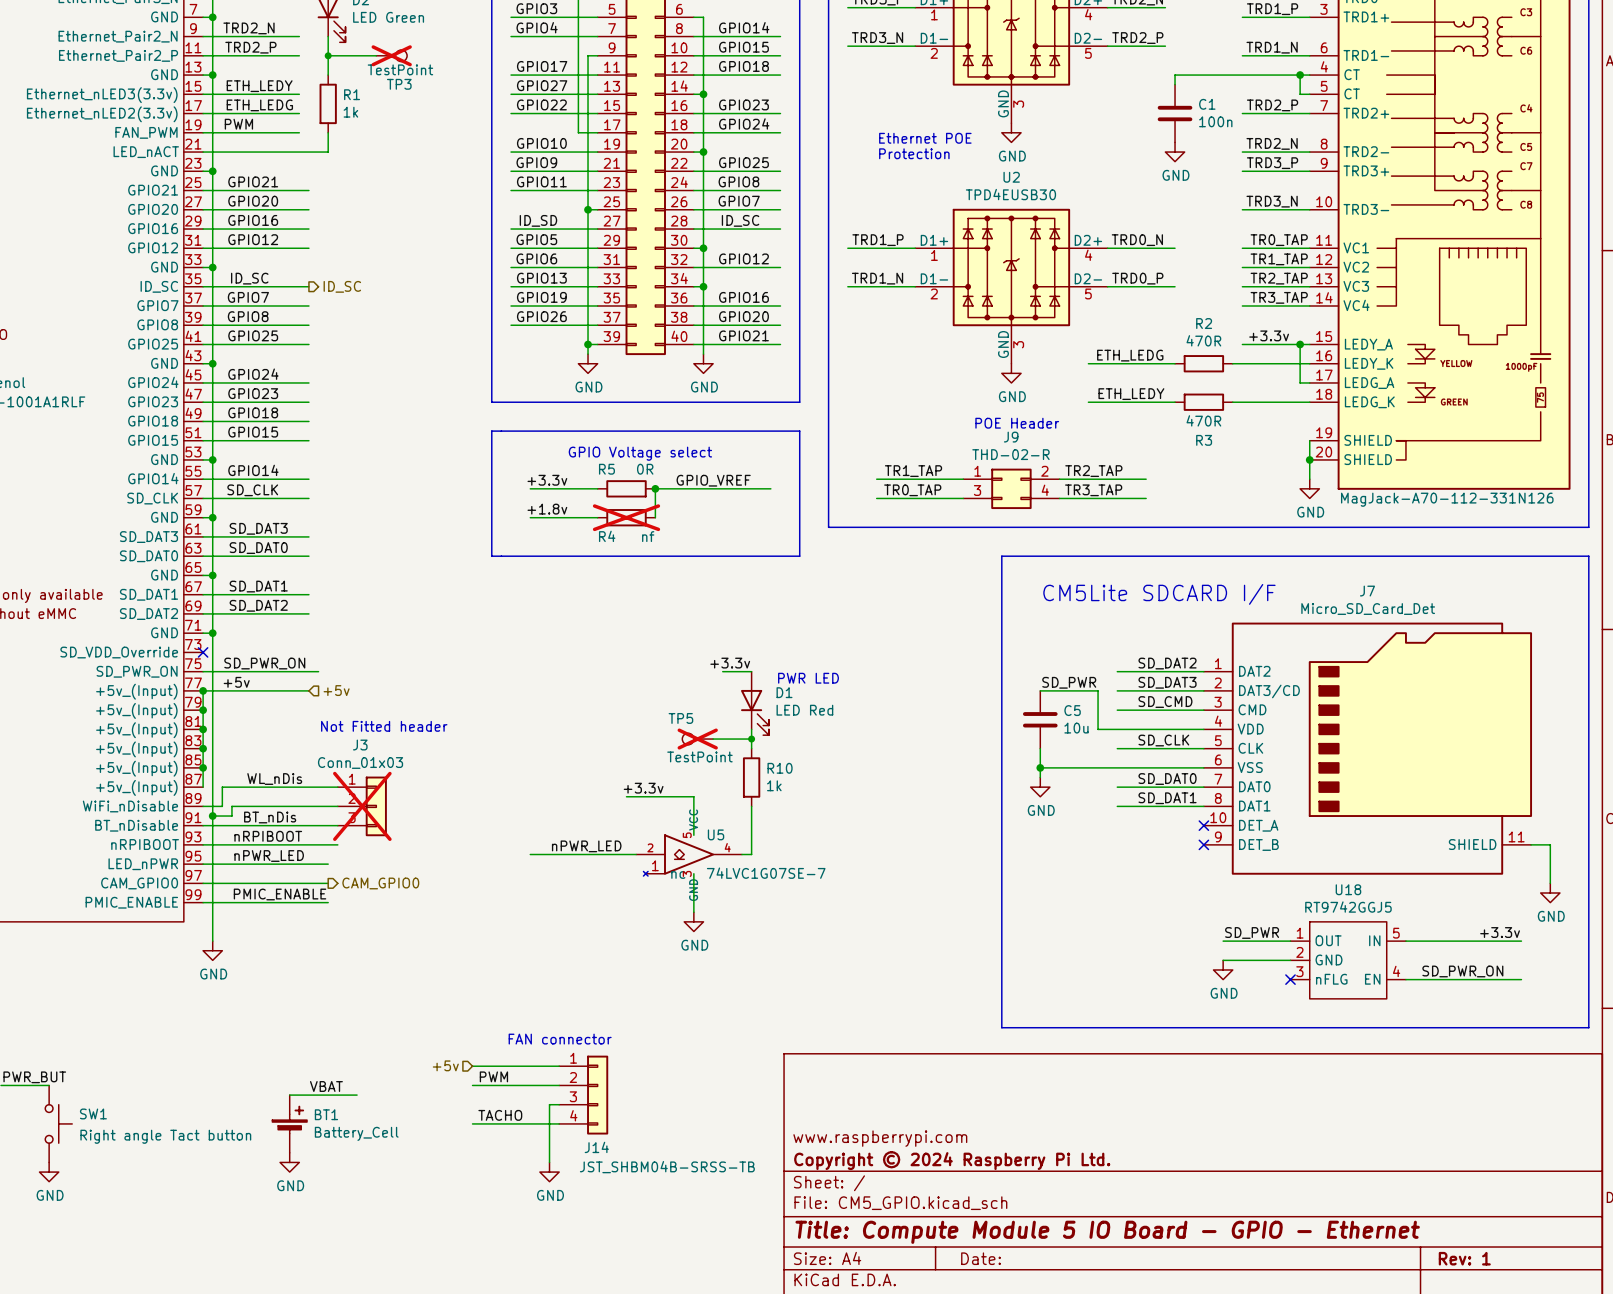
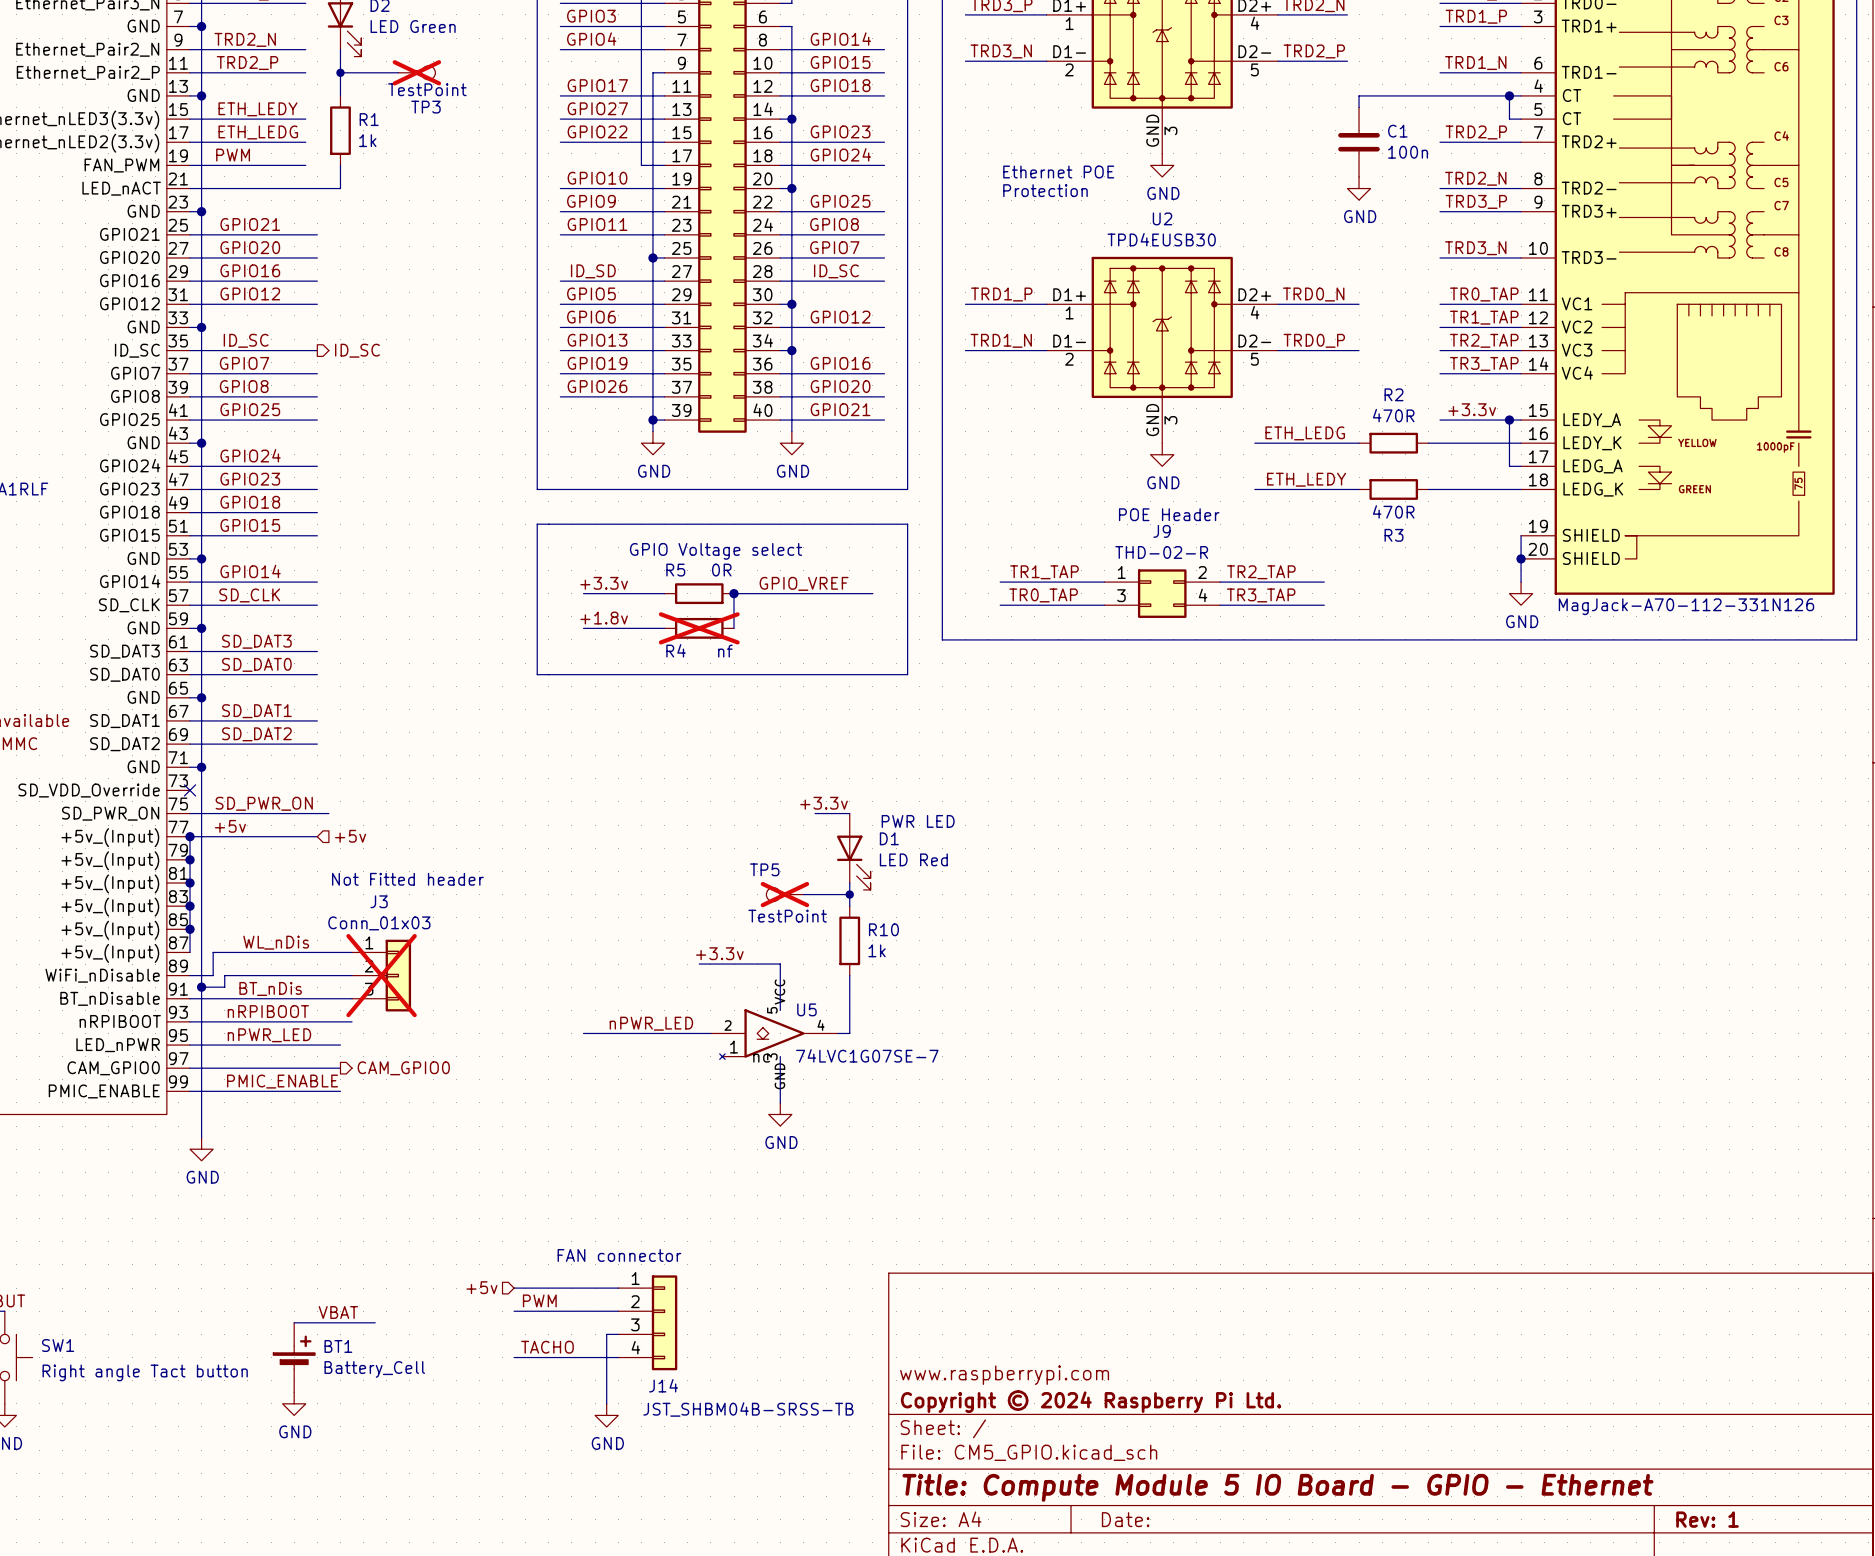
line: (1001, 556) (1001, 1027) (1588, 1027) (1588, 556) (1001, 556) -> none
text: CM5Lite SDCARD I/F (1159, 594) -> none
label: SD_DAT2 (1167, 663) -> none
wire: (1117, 671) (1203, 671) -> none
label: SD_PWR (1069, 682) -> none
label: SD_DAT3 (1167, 682) -> none
wire: (1040, 690) (1098, 690) (1098, 729) (1203, 729) -> none
wire: (1117, 690) (1203, 690) -> none
label: SD_CMD (1165, 702) -> none
wire: (1117, 710) (1203, 710) -> none
C5: 10u (1040, 719) -> none
label: SD_CLK (1163, 740) -> none
wire: (1040, 748) (1040, 777) -> none
wire: (1117, 748) (1203, 748) -> none
J7: Micro_SD_Card_Det (1367, 748) -> none
wire: (1040, 767) (1203, 767) -> none
junction: (1040, 767) -> none
label: SD_DAT0 (1167, 779) -> none
power symbol: GND (1040, 787) -> none
wire: (1117, 787) (1203, 787) -> none
label: SD_DAT1 (1167, 798) -> none
wire: (1117, 806) (1203, 806) -> none
no-connect mark: (1203, 825) -> none
no-connect mark: (1203, 844) -> none
wire: (1531, 844) (1550, 844) (1550, 883) -> none
power symbol: GND (1550, 893) -> none
label: SD_PWR (1252, 932) -> none
label: +3.3v (1500, 932) -> none
wire: (1223, 941) (1290, 941) -> none
wire: (1405, 941) (1521, 941) -> none
wire: (1223, 960) (1290, 960) -> none
U18: RT9742GGJ5 (1348, 960) -> none
power symbol: GND (1223, 969) -> none
label: SD_PWR_ON (1462, 971) -> none
no-connect mark: (1290, 979) -> none
wire: (1405, 979) (1521, 979) -> none

